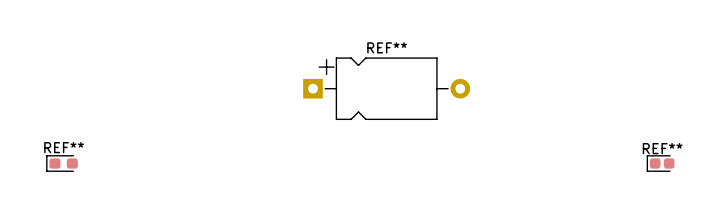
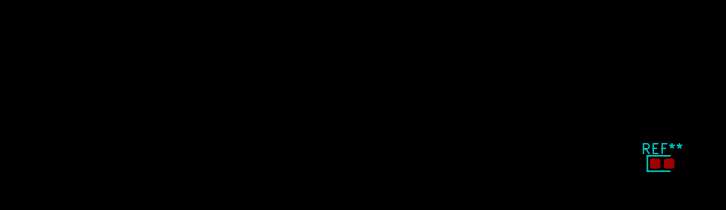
REF**: (386, 88) -> none
REF**: (62, 163) -> none

